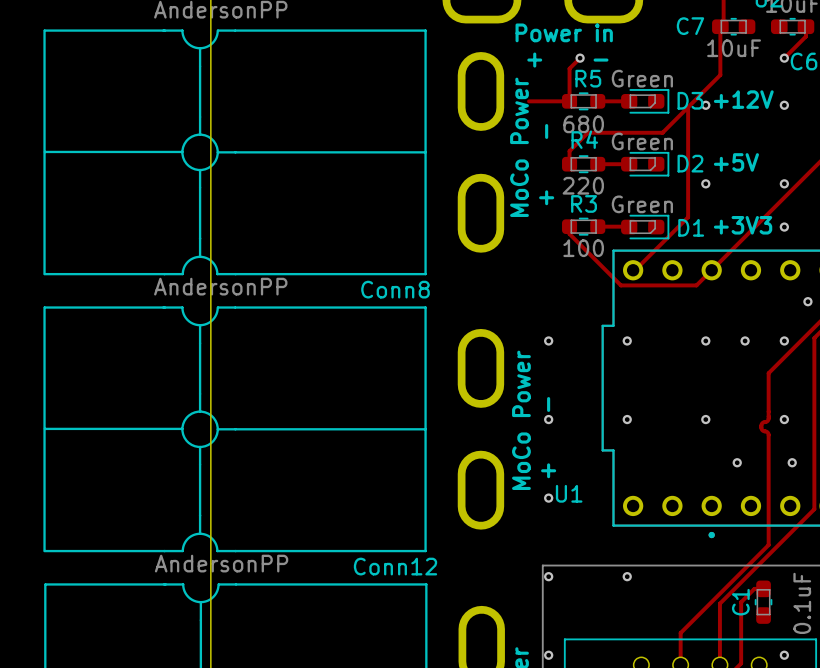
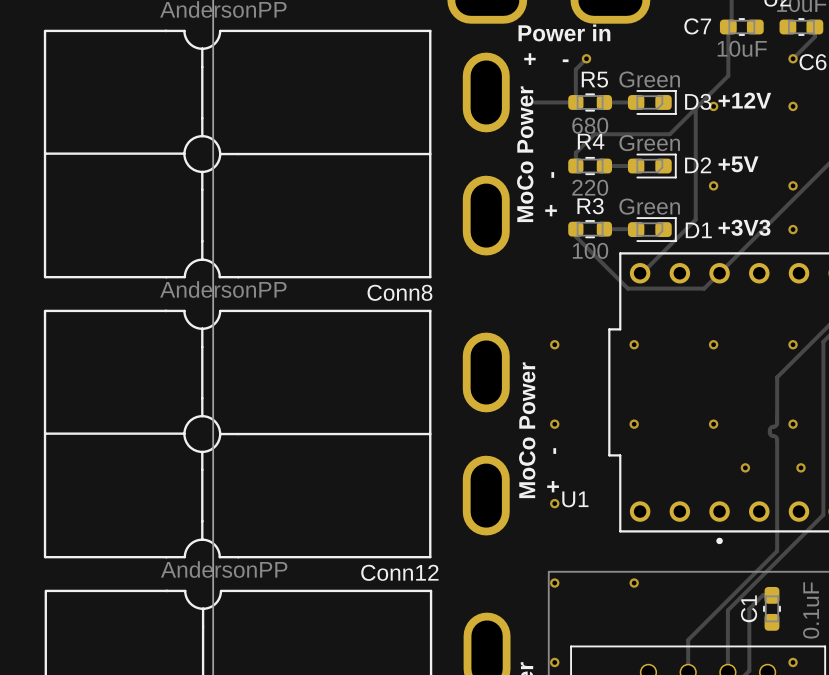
via: (807, 301) -> none
via: (745, 340) -> none

